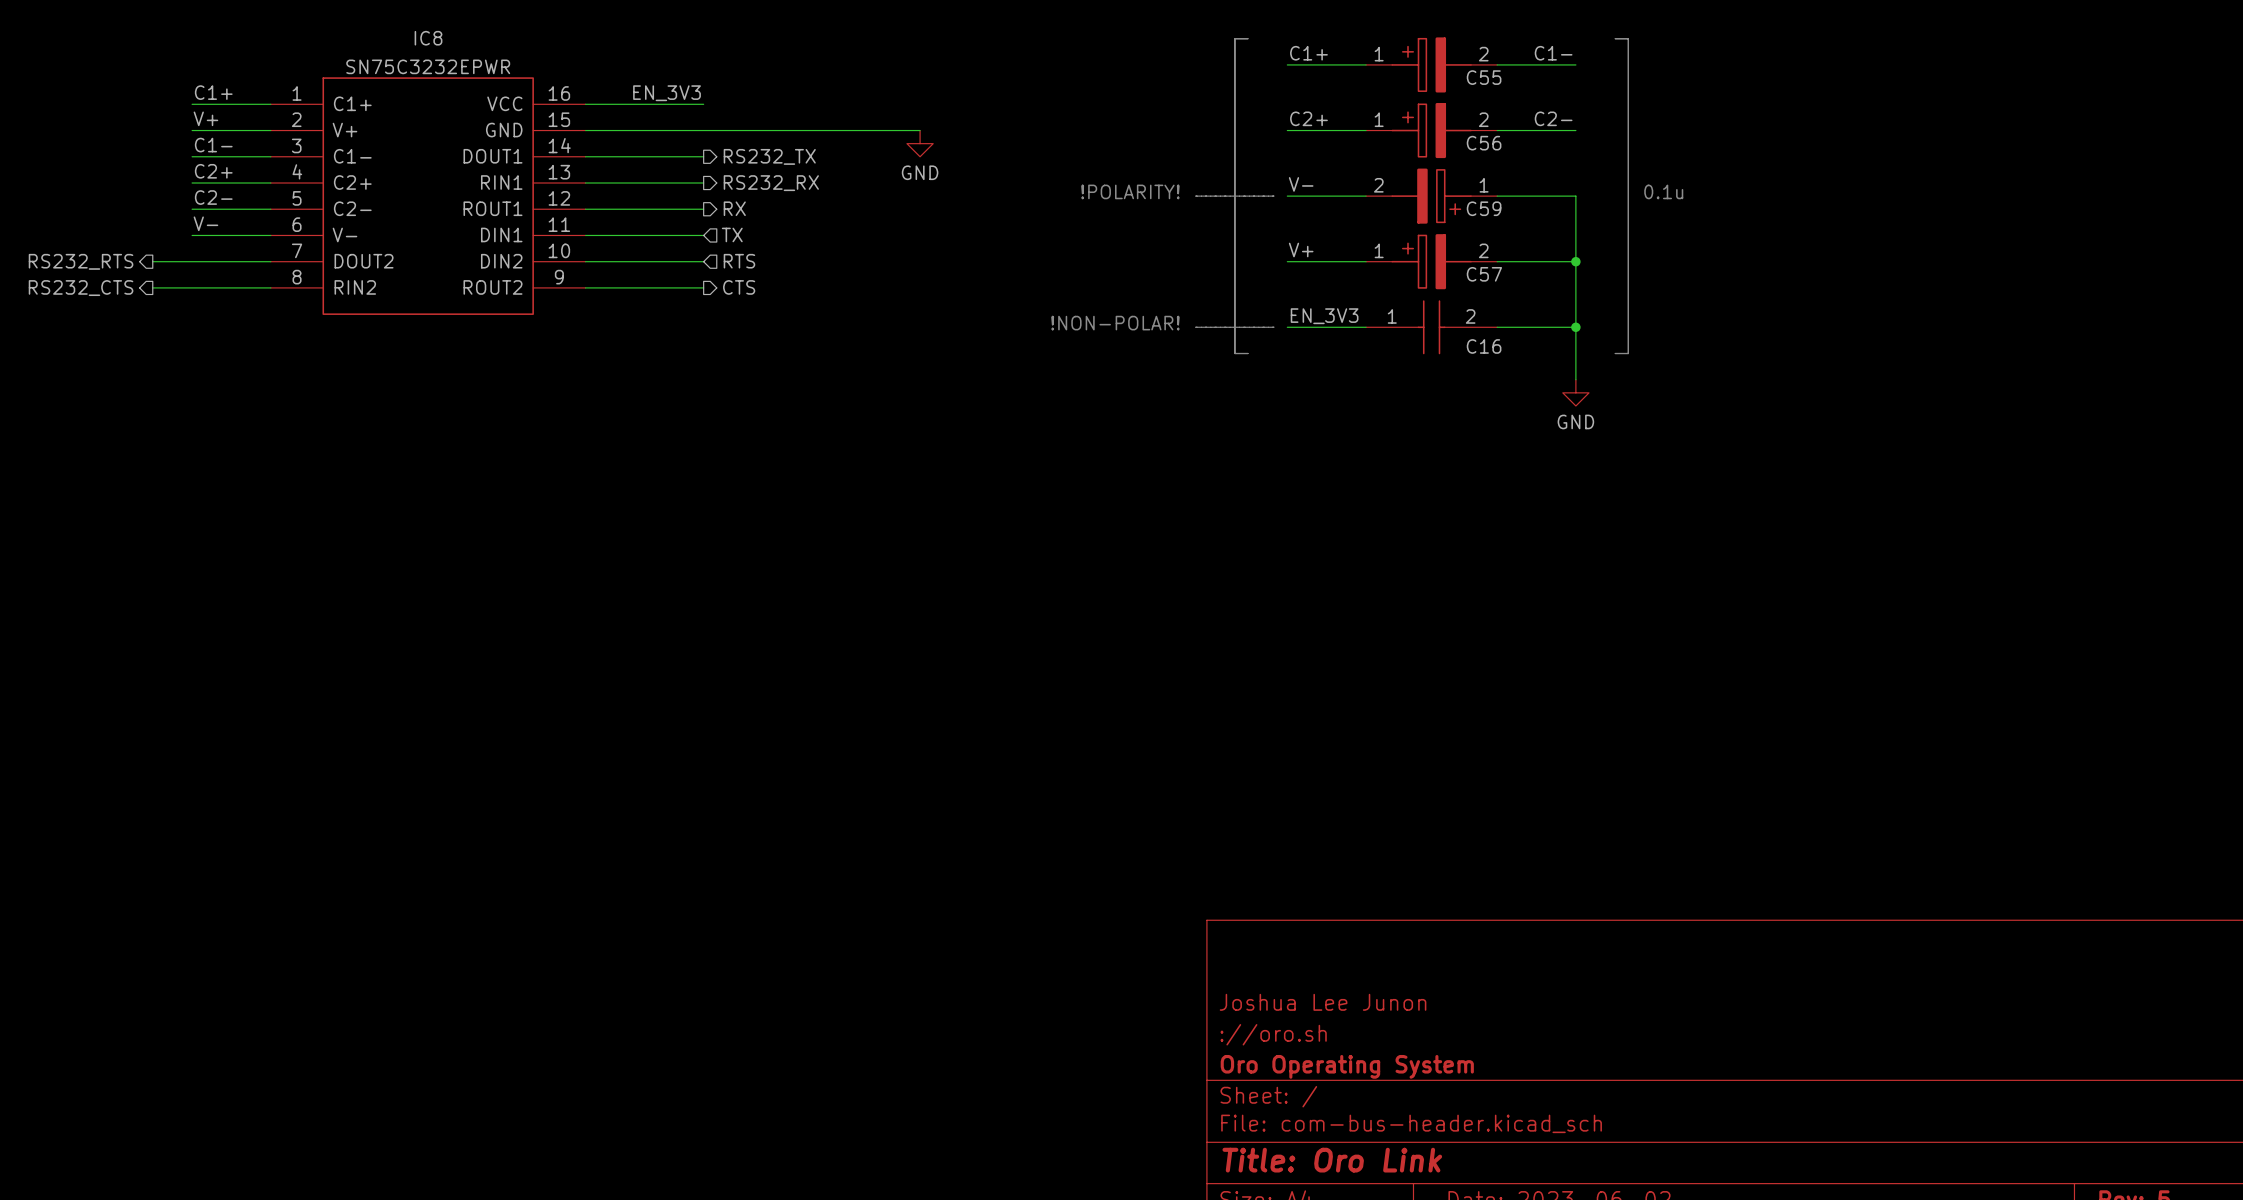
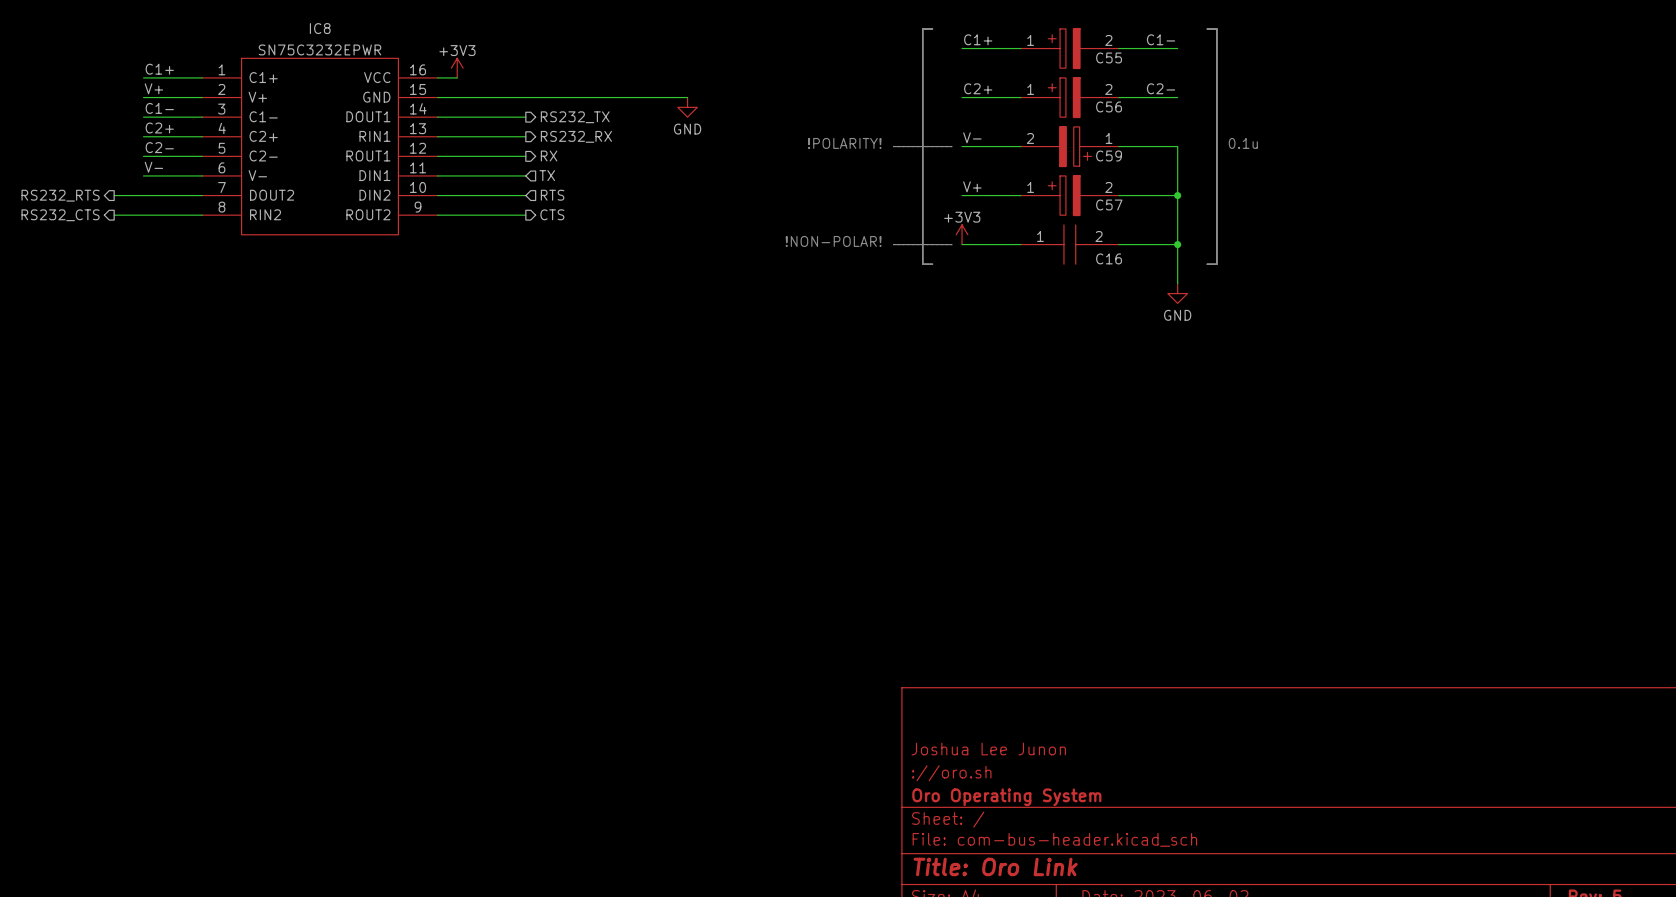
power symbol: none -> +3V3 (457, 68)
label: EN_3V3 (667, 93) -> none
wire: (611, 104) (703, 104) -> none
power symbol: none -> +3V3 (962, 234)
label: EN_3V3 (1324, 316) -> none

